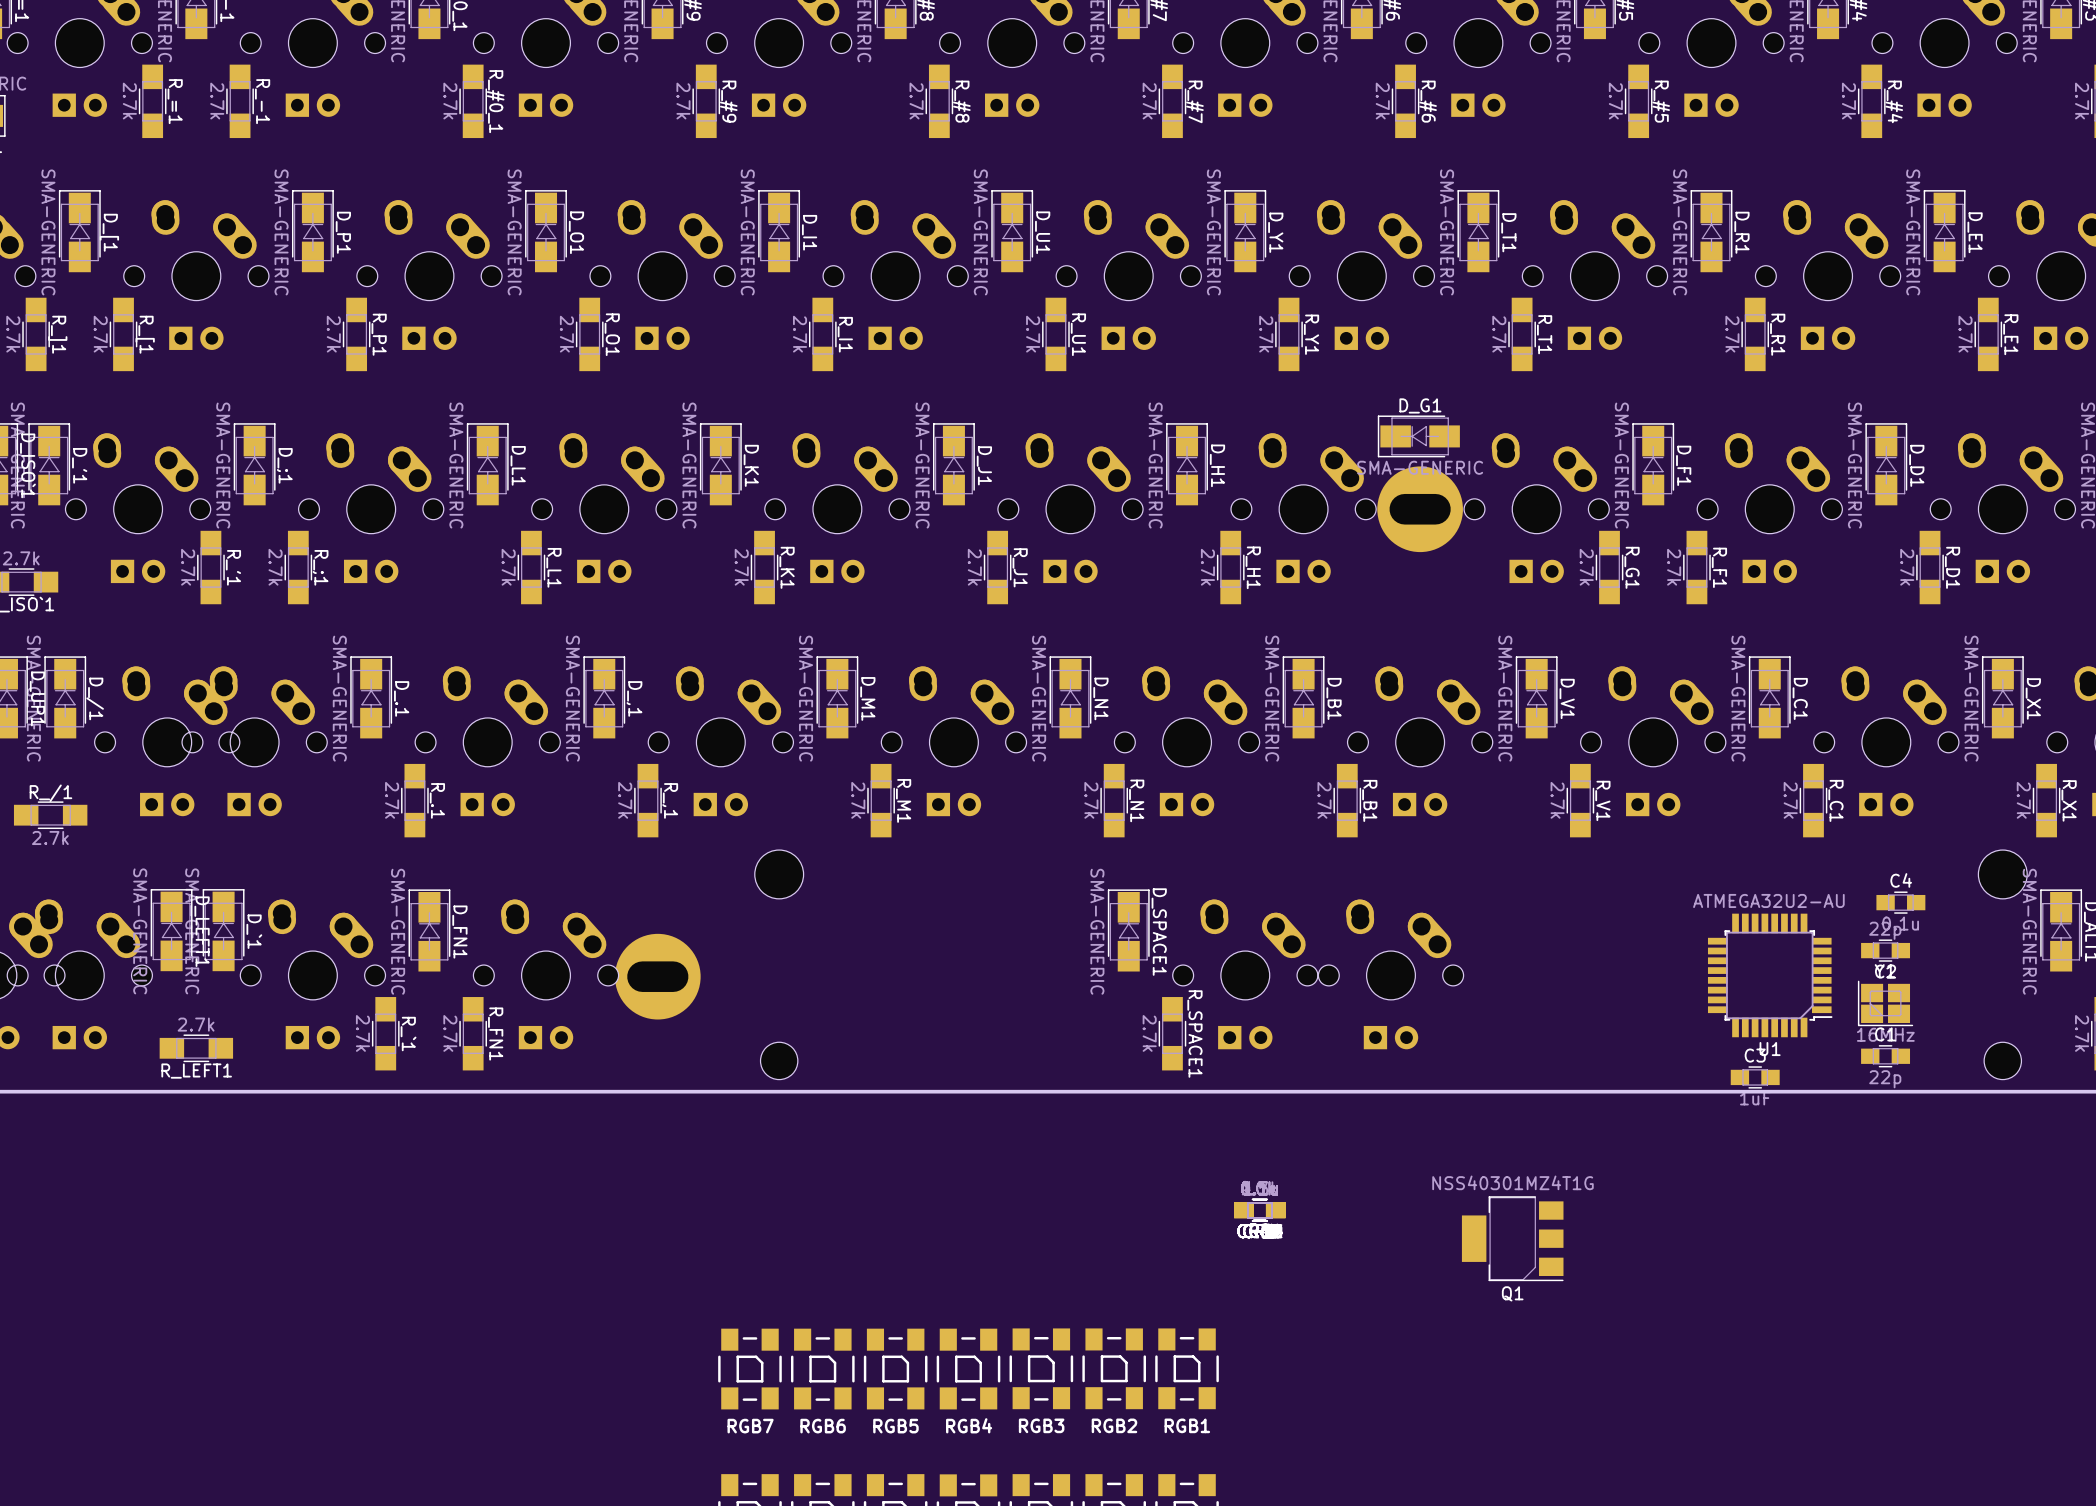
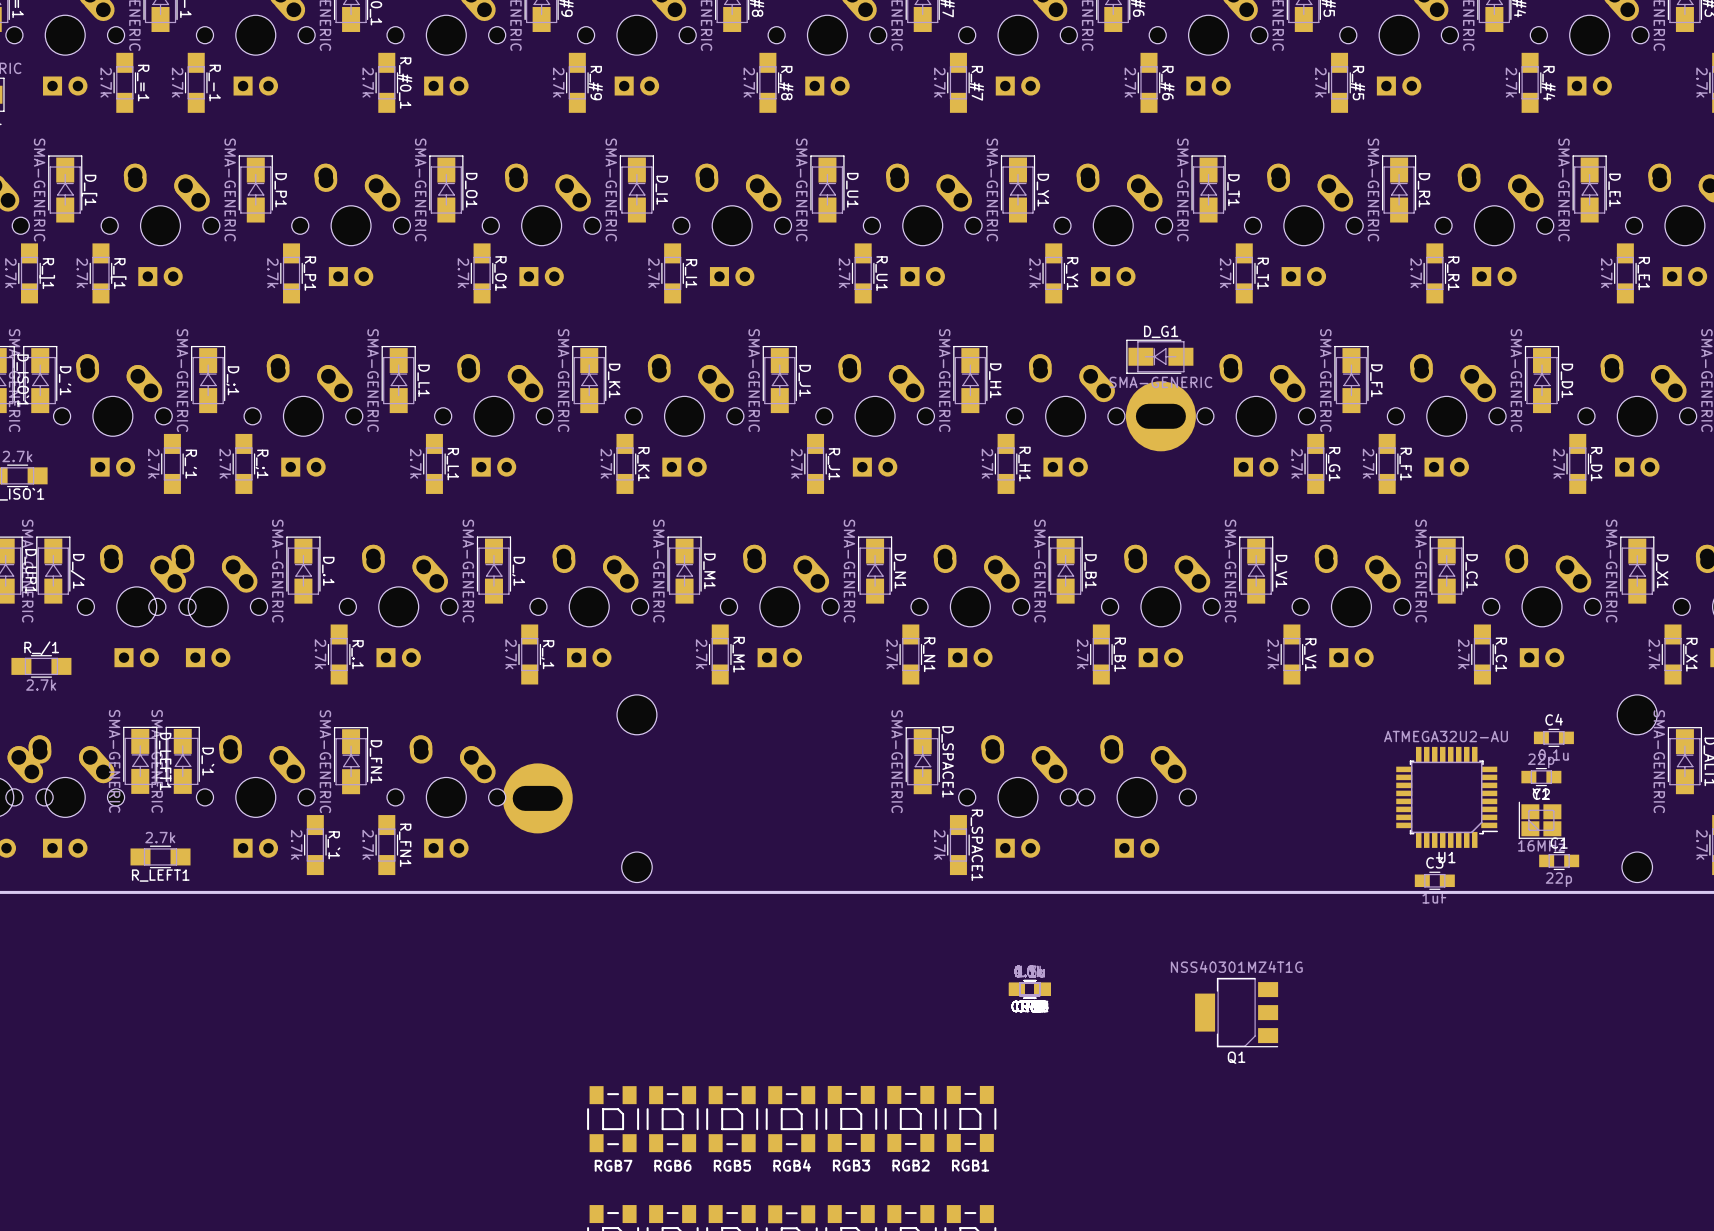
C1 position: (1885, 1056) -> (1559, 860)

